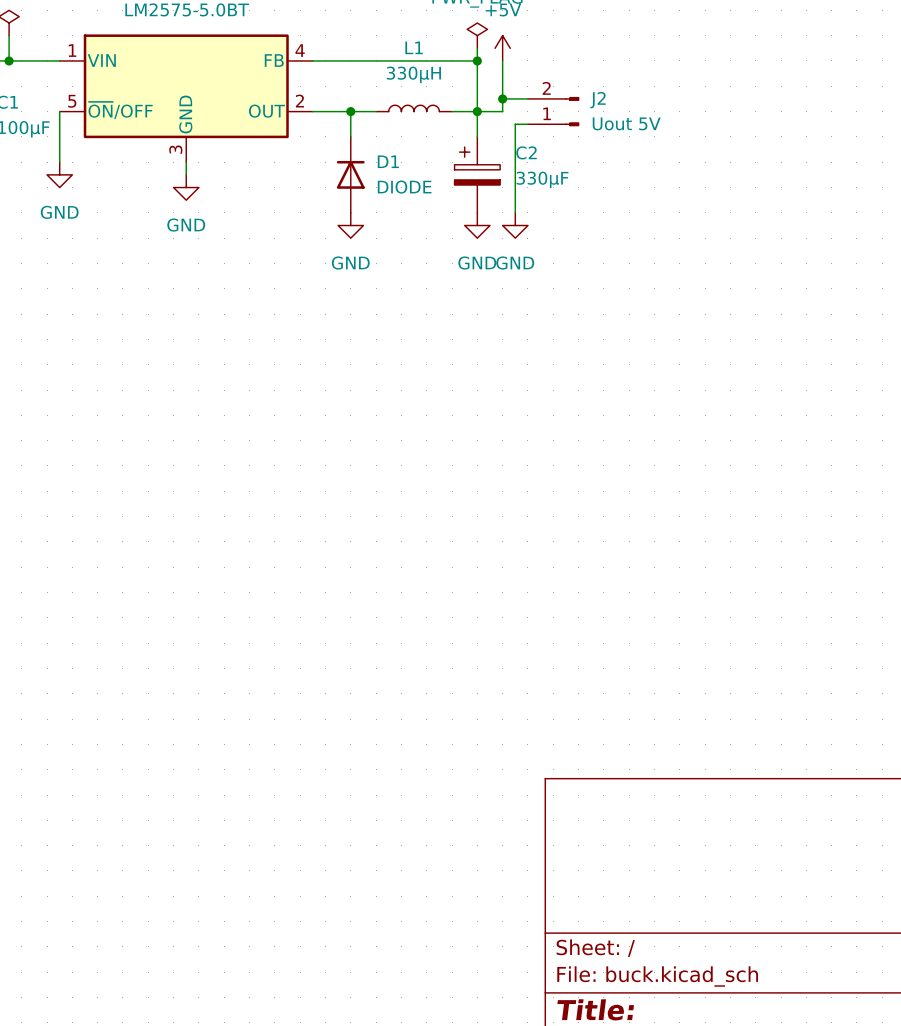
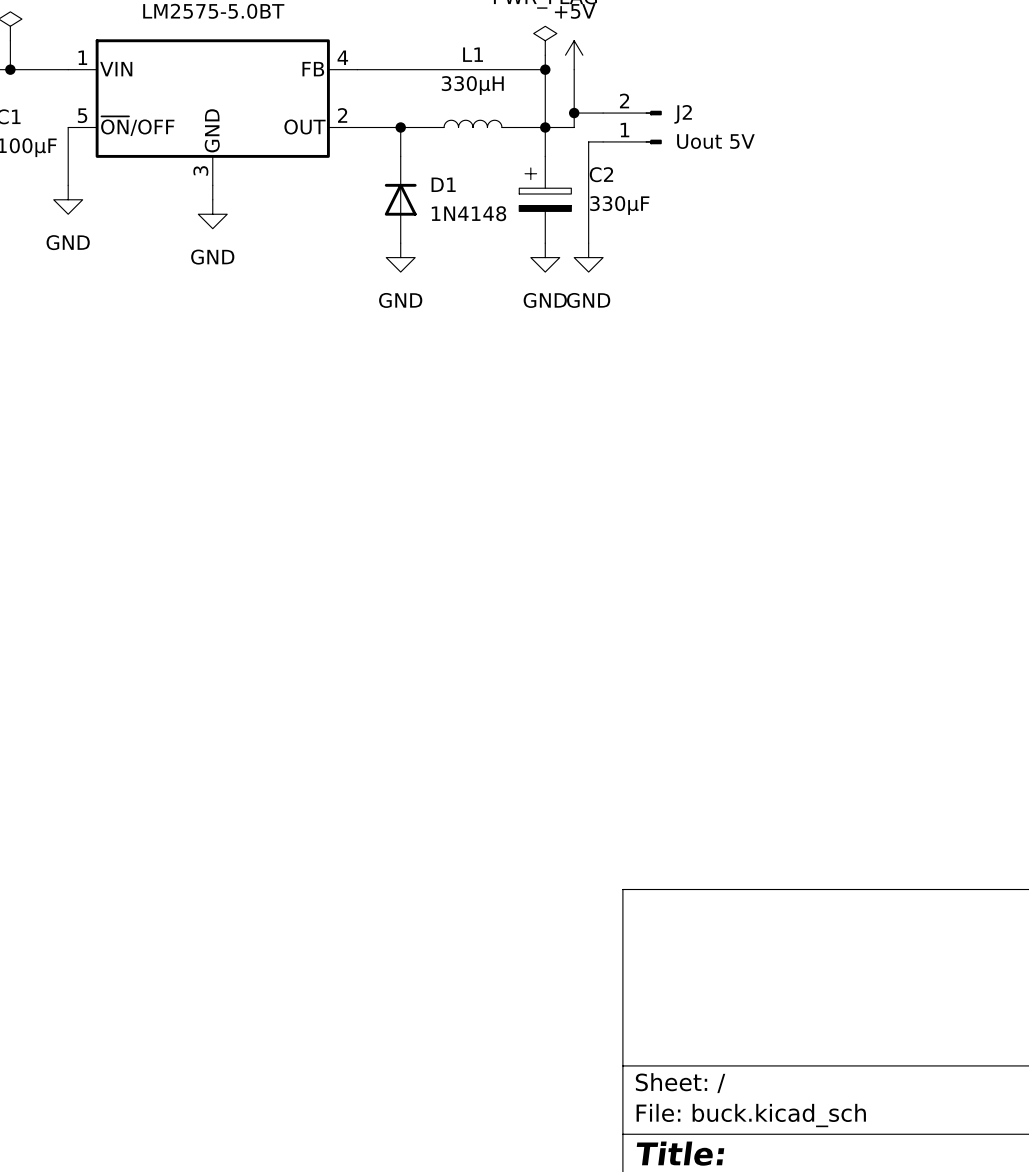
D1 value: DIODE (404, 187) -> 1N4148 (468, 213)

